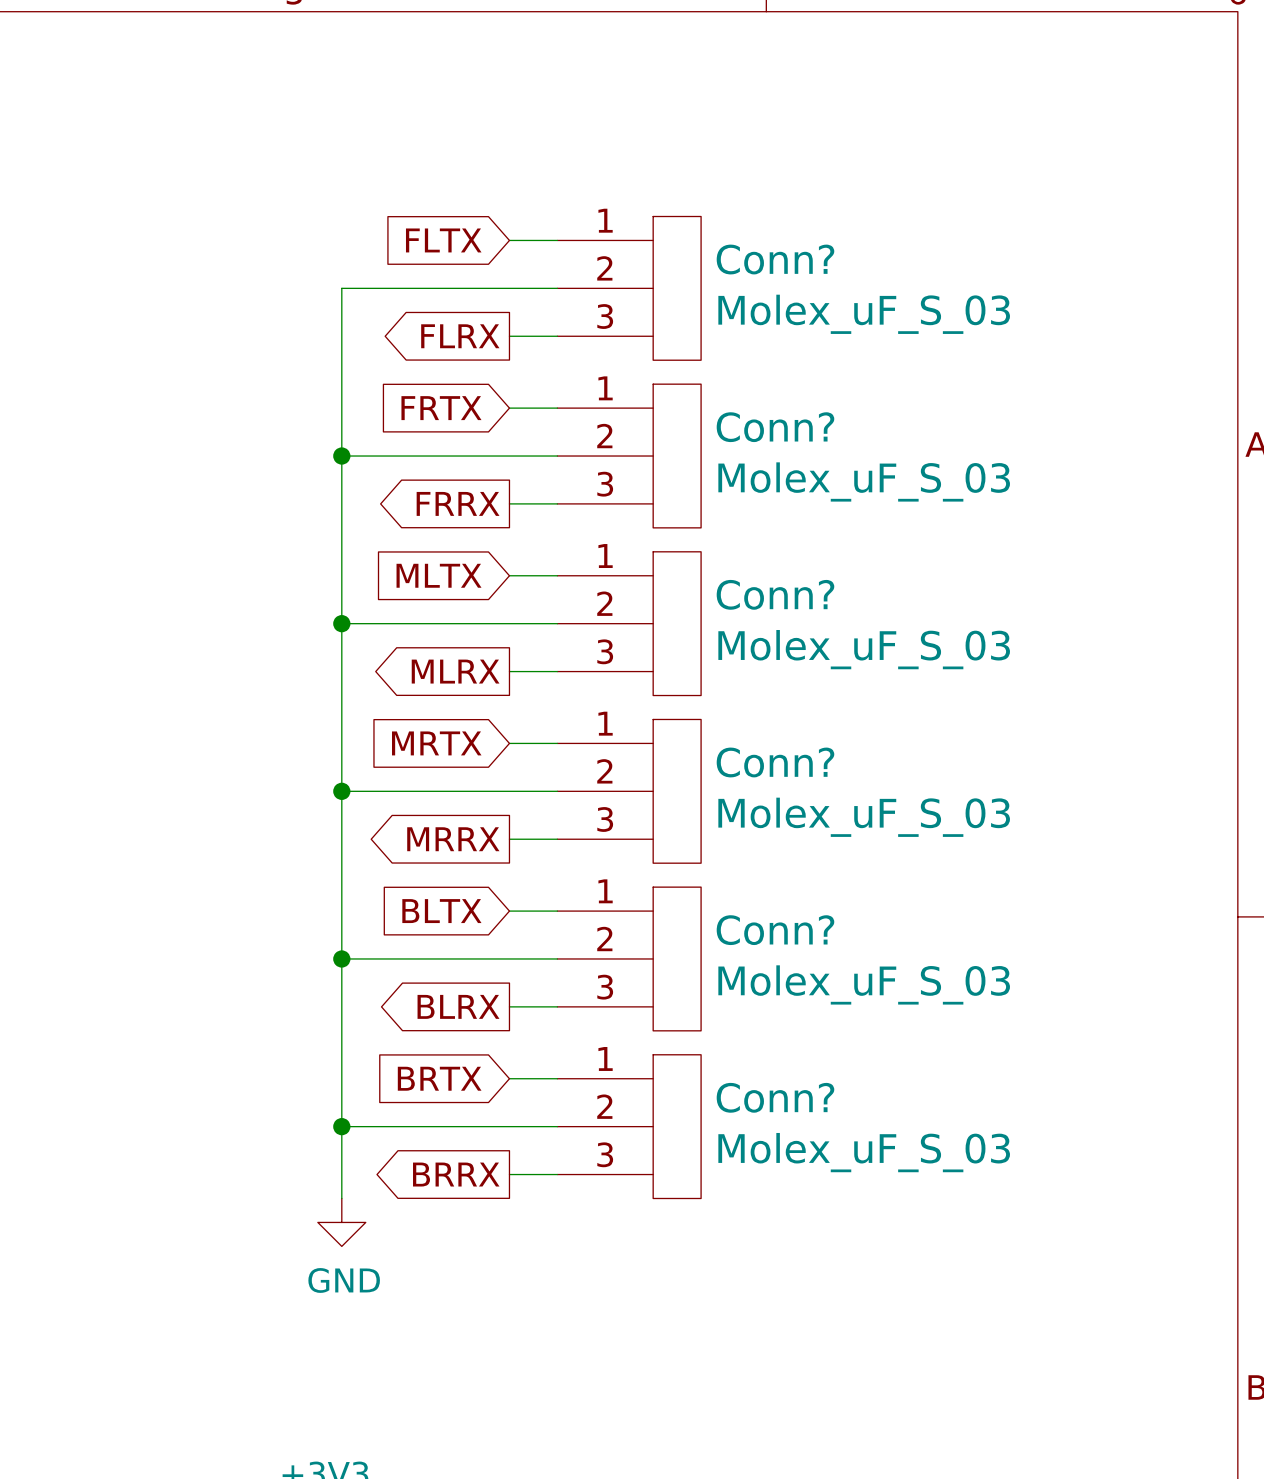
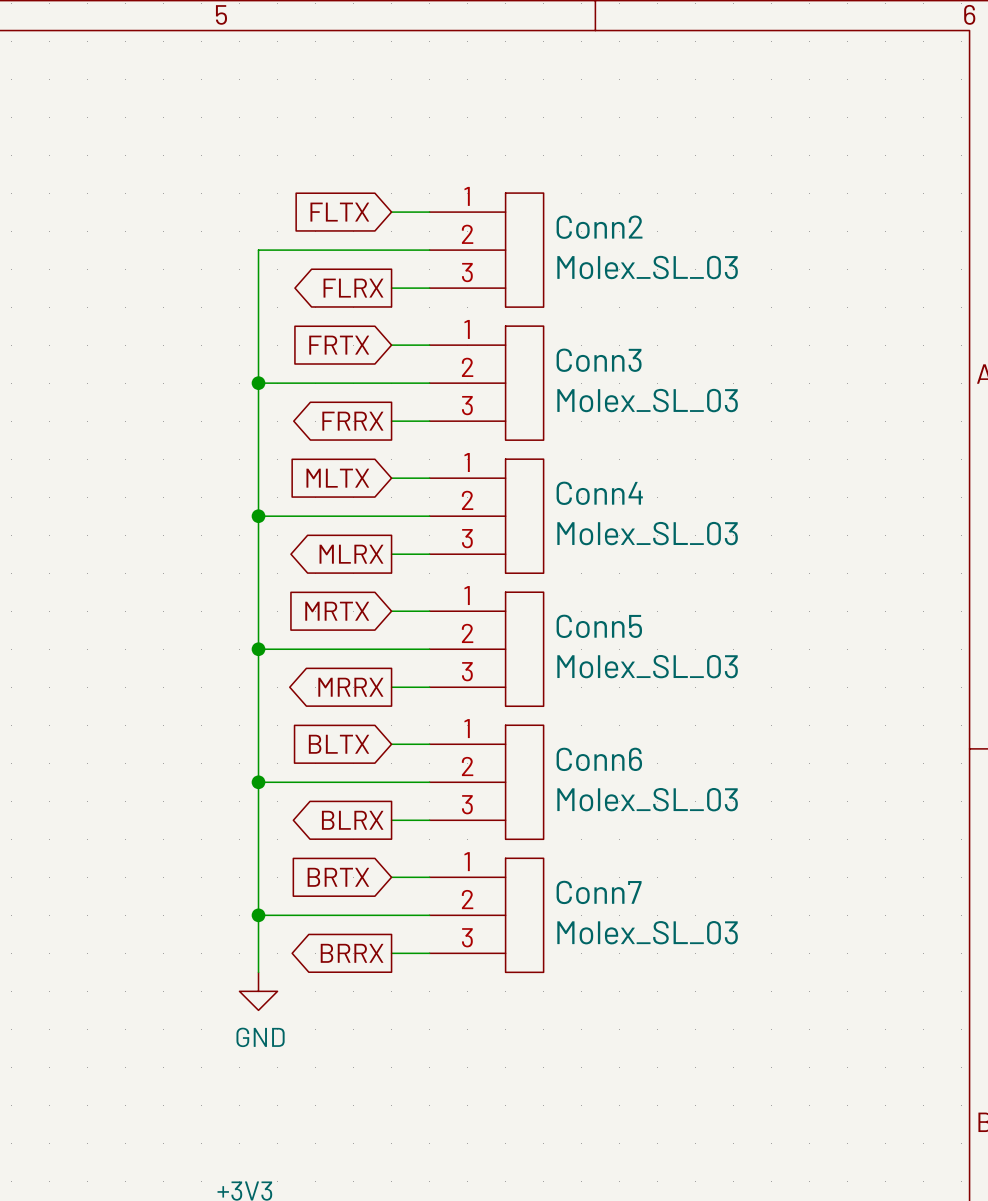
Conn? name: Conn? (775, 259) -> Conn2 (599, 227)
Conn? value: Molex_uF_S_03 (864, 314) -> Molex_SL_03 (647, 267)
Conn? name: Conn? (775, 427) -> Conn3 (599, 360)
Conn? value: Molex_uF_S_03 (864, 481) -> Molex_SL_03 (647, 400)
Conn? name: Conn? (775, 594) -> Conn4 (599, 493)
Conn? value: Molex_uF_S_03 (864, 649) -> Molex_SL_03 (647, 533)
Conn? name: Conn? (775, 762) -> Conn5 (599, 626)
Conn? value: Molex_uF_S_03 (864, 817) -> Molex_SL_03 (647, 666)
Conn? name: Conn? (775, 930) -> Conn6 (599, 759)
Conn? value: Molex_uF_S_03 (864, 984) -> Molex_SL_03 (647, 799)
Conn? name: Conn? (775, 1097) -> Conn7 (599, 892)
Conn? value: Molex_uF_S_03 (864, 1152) -> Molex_SL_03 (647, 932)

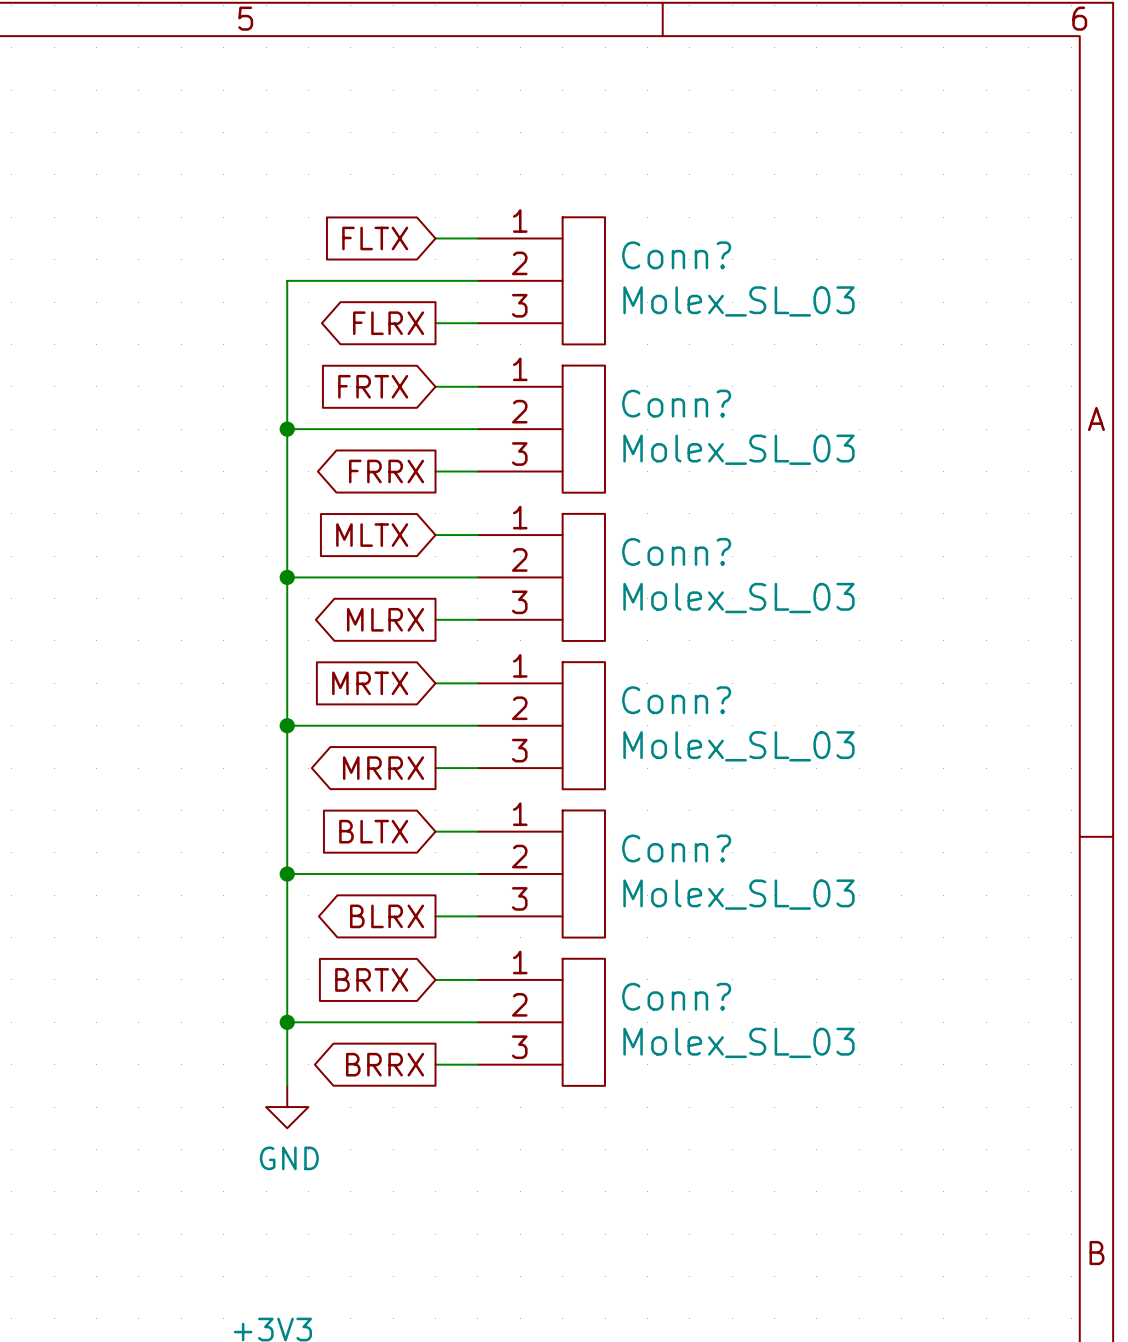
Conn2 name: Conn2 (599, 227) -> Conn? (676, 255)
Conn3 name: Conn3 (599, 360) -> Conn? (676, 403)
Conn4 name: Conn4 (599, 493) -> Conn? (676, 551)
Conn5 name: Conn5 (599, 626) -> Conn? (676, 700)
Conn6 name: Conn6 (599, 759) -> Conn? (676, 848)
Conn7 name: Conn7 (599, 892) -> Conn? (676, 996)

